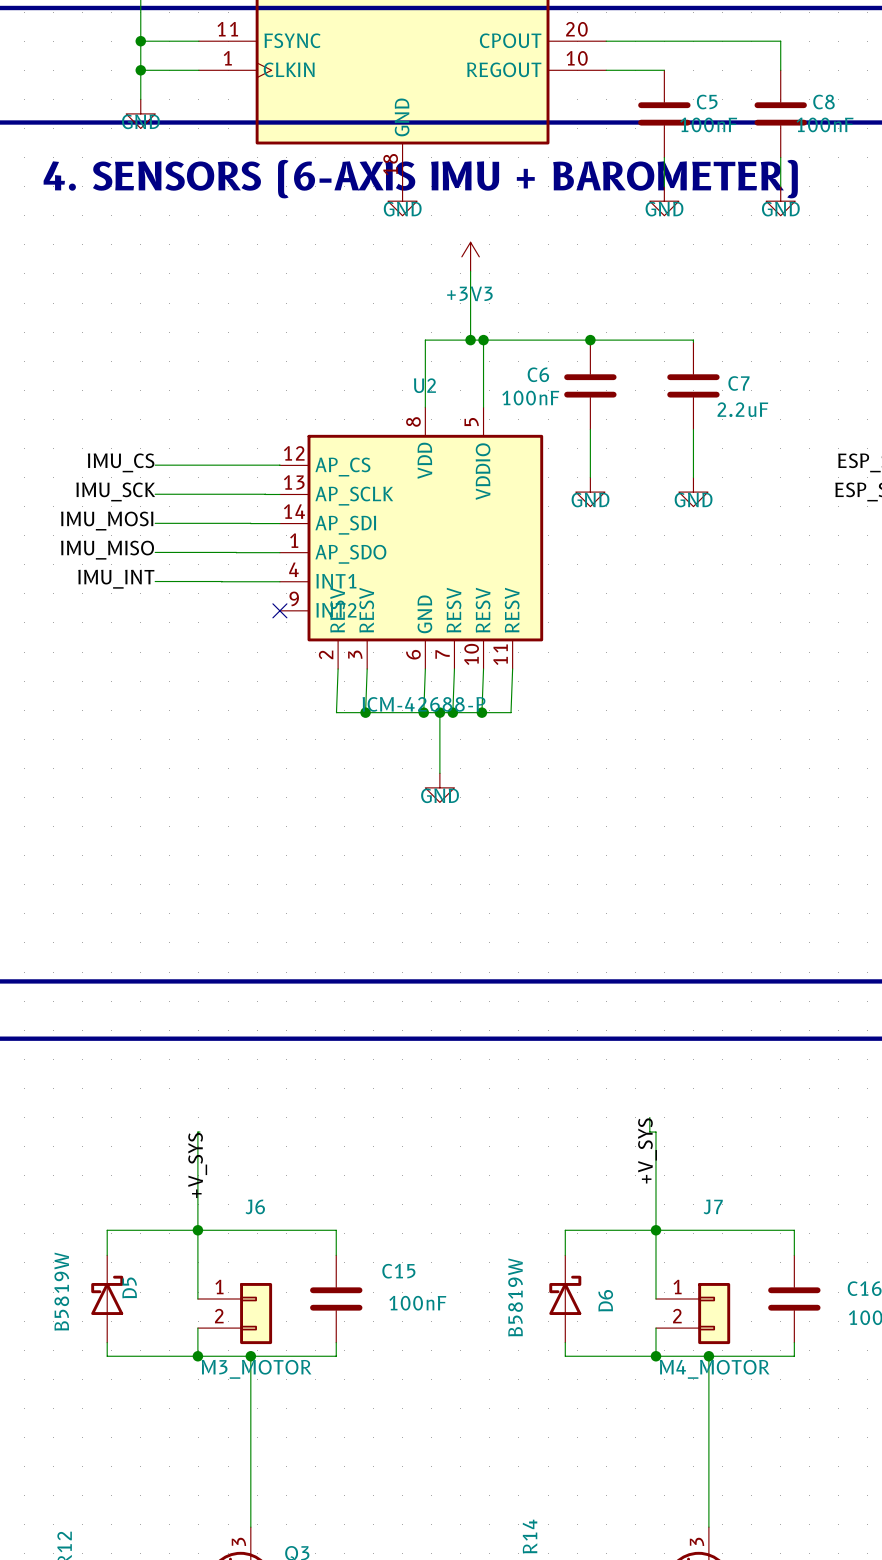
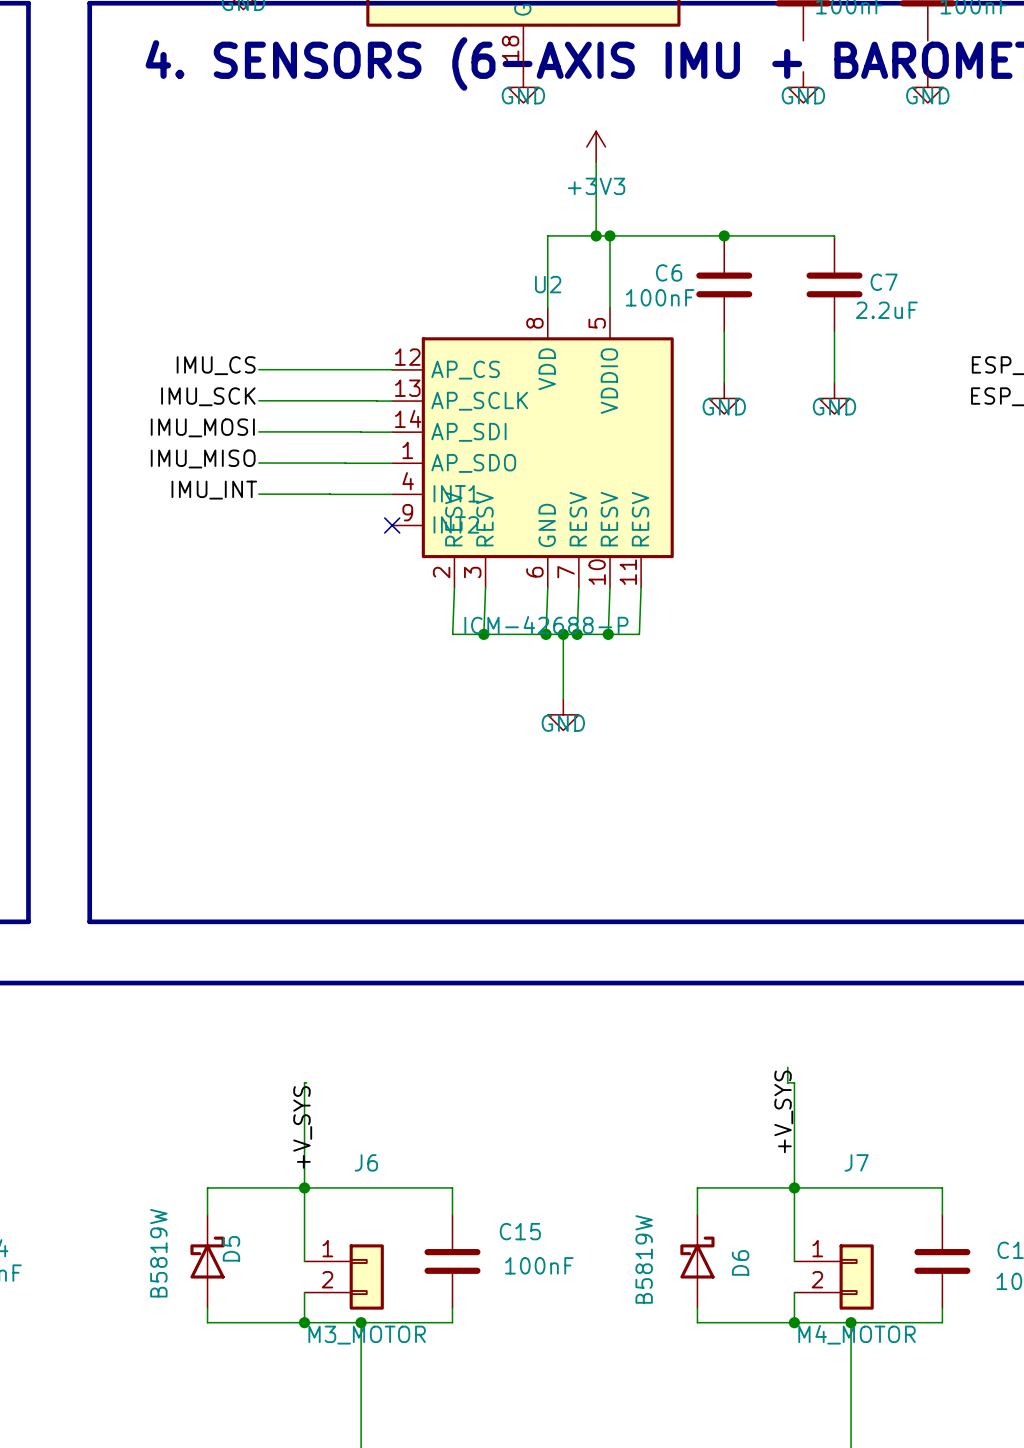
wire: (664, 157) (664, 186) -> none
wire: (780, 157) (780, 186) -> none

